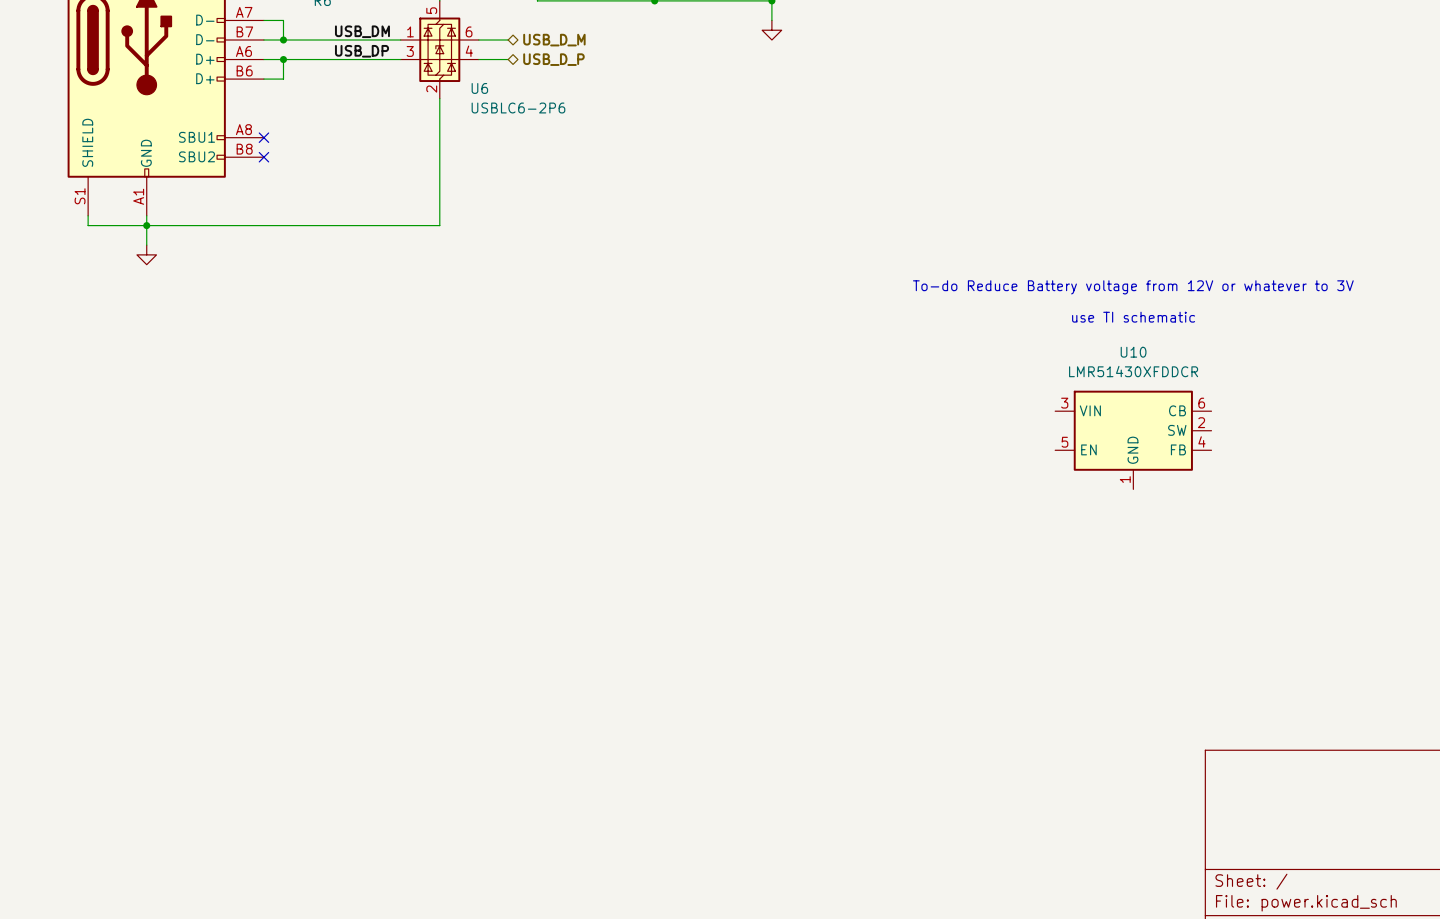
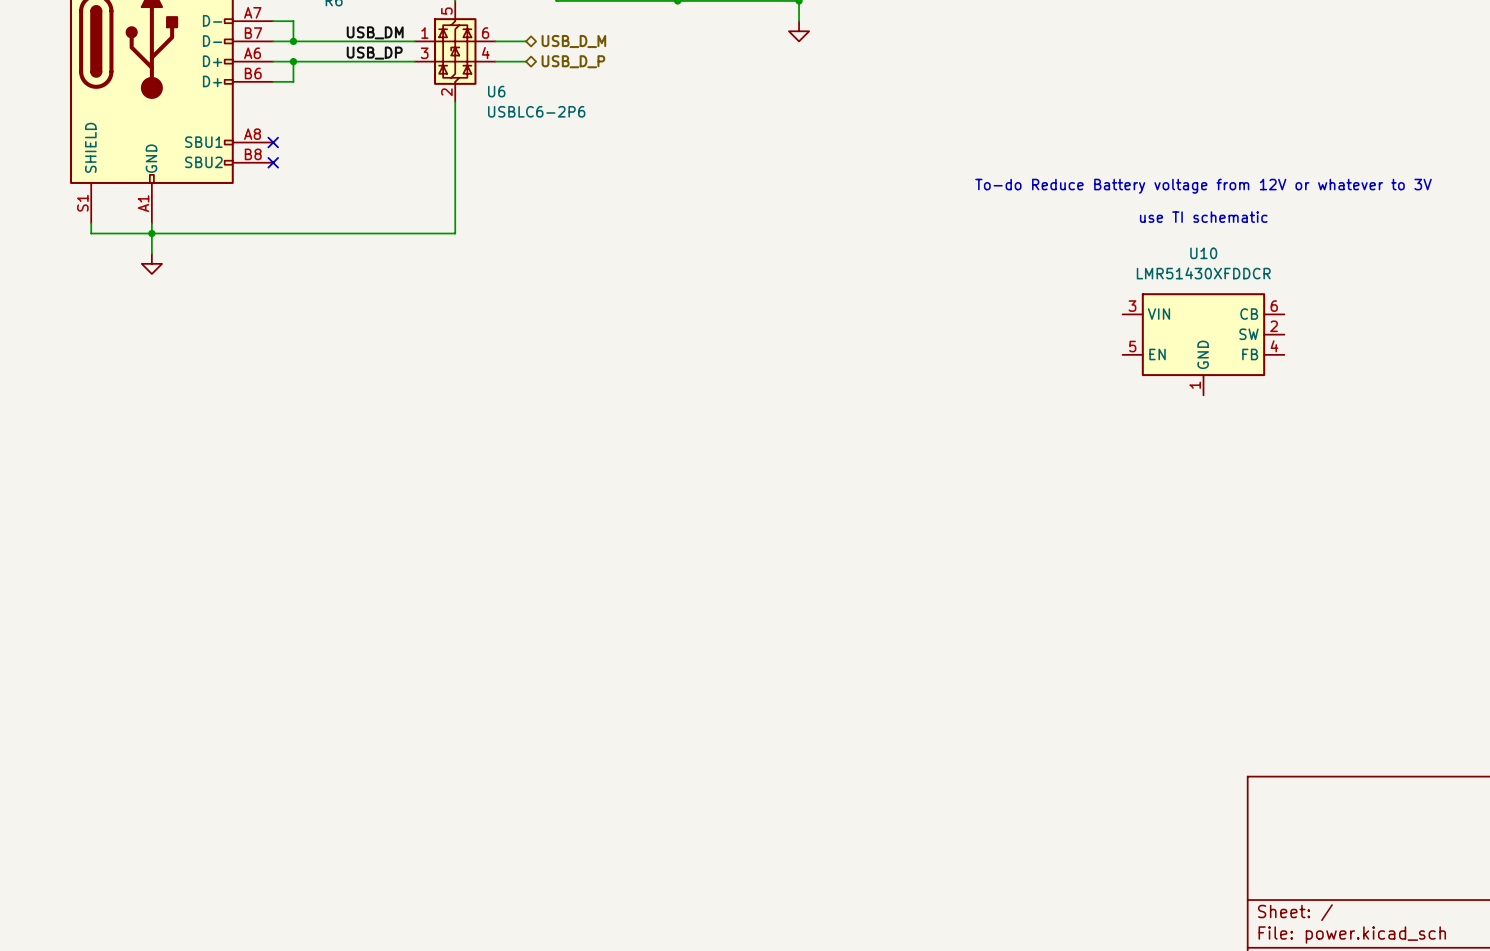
text position: To-do Reduce Battery voltage from 12V or whatever to 3V (1133, 287) -> To-do Reduce Battery voltage from 12V or whatever to 3V (1203, 186)
text position: use TI schematic (1133, 317) -> use TI schematic (1203, 217)
U10 position: (1133, 440) -> (1203, 344)

